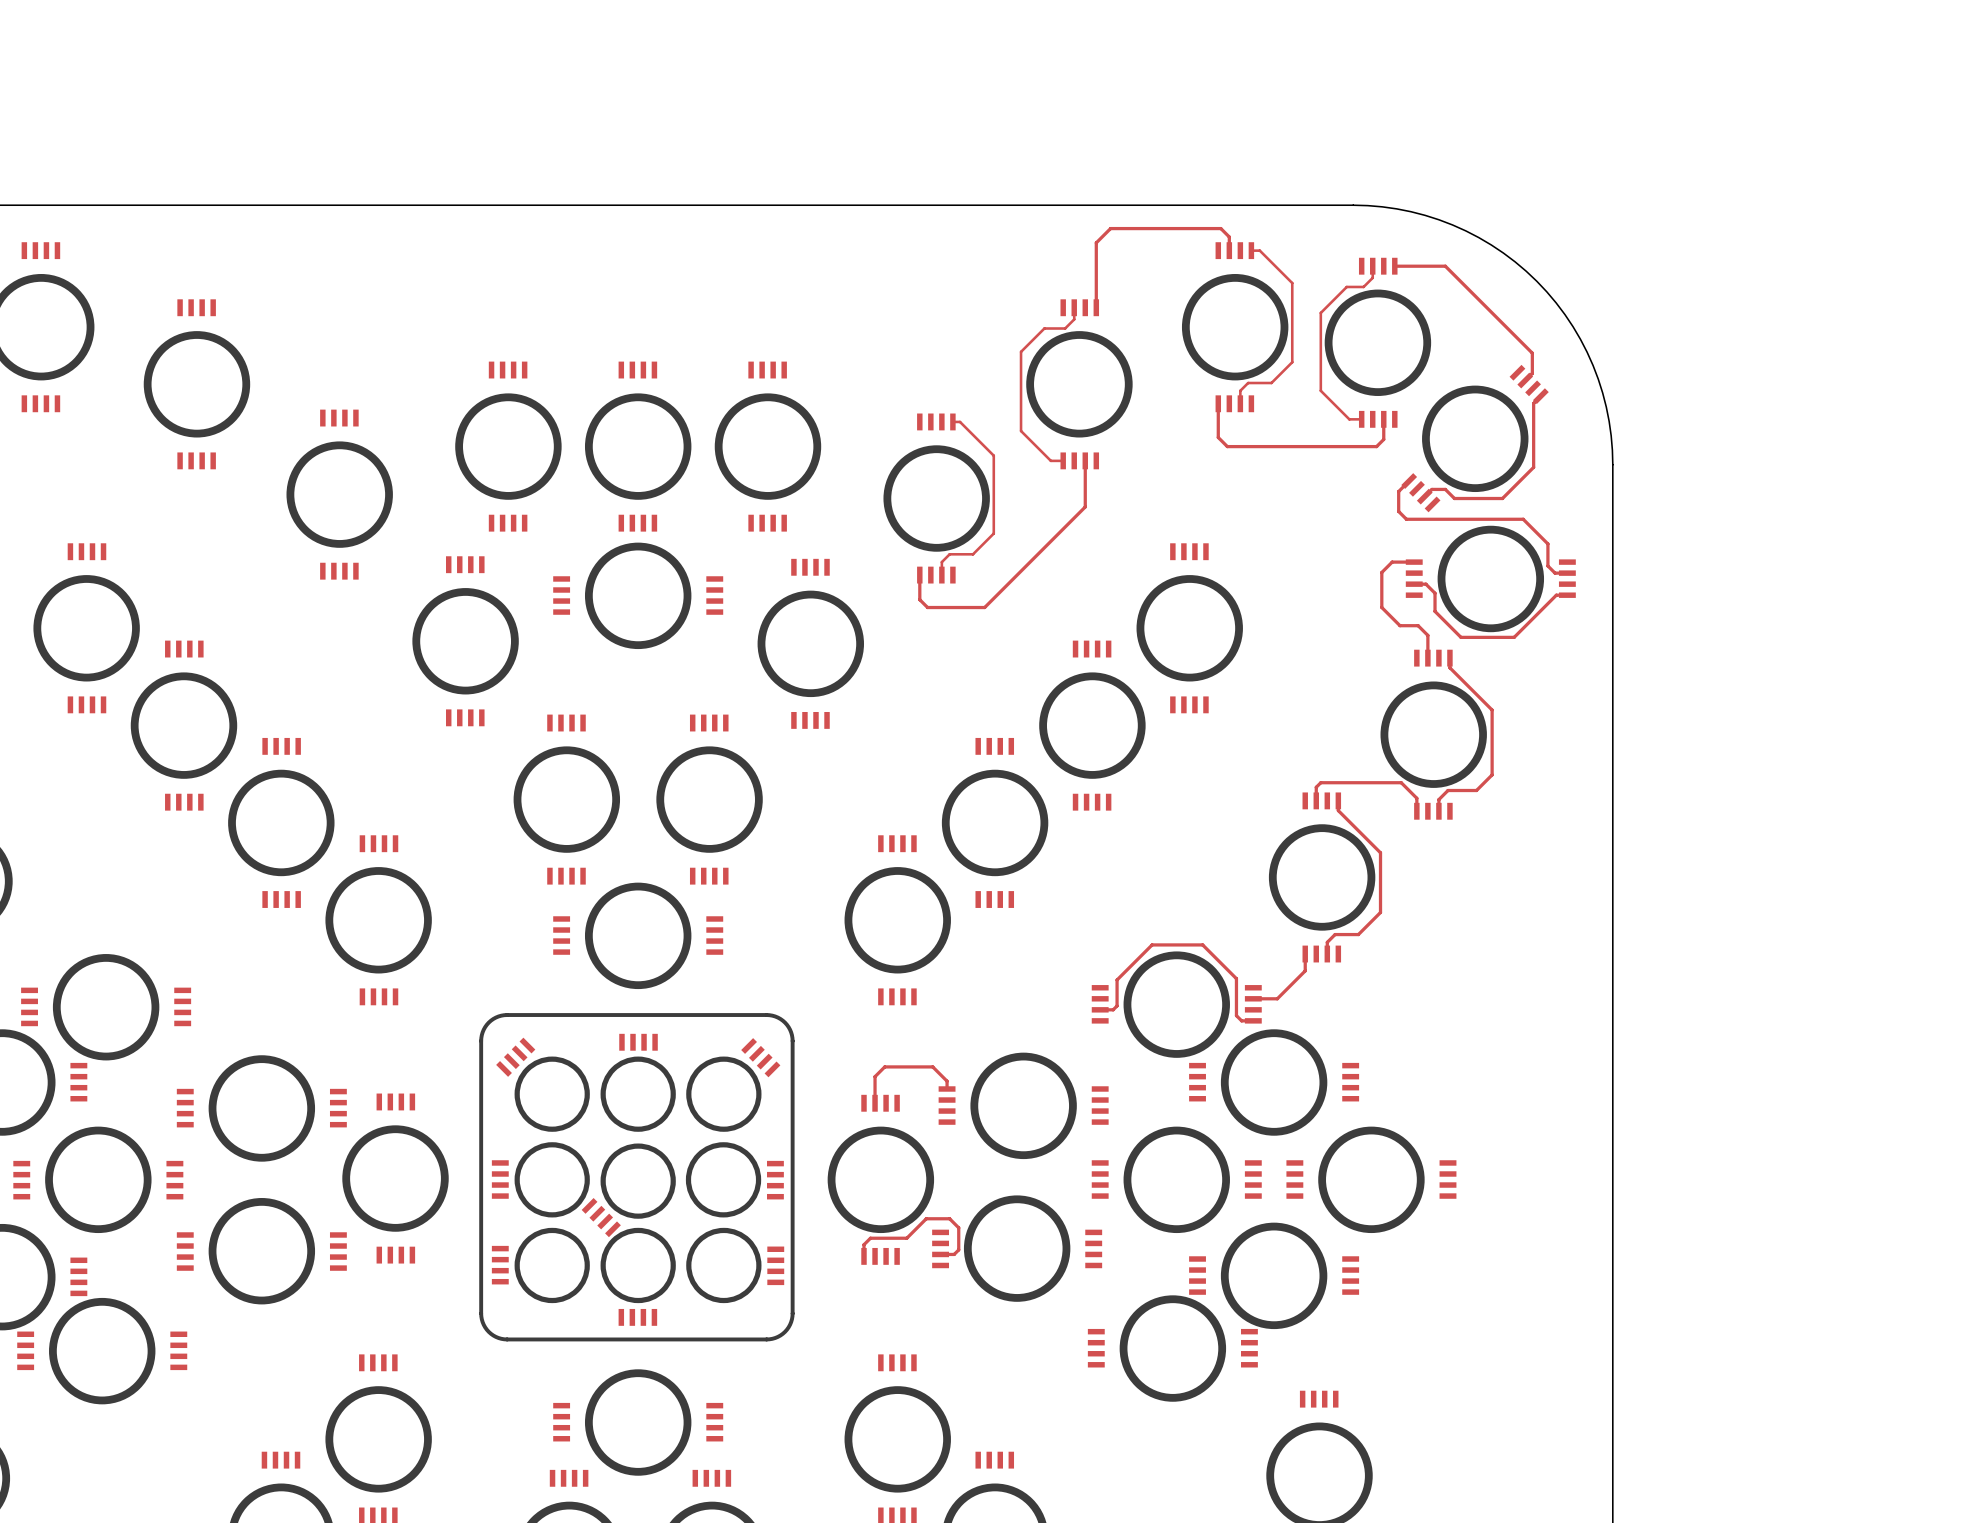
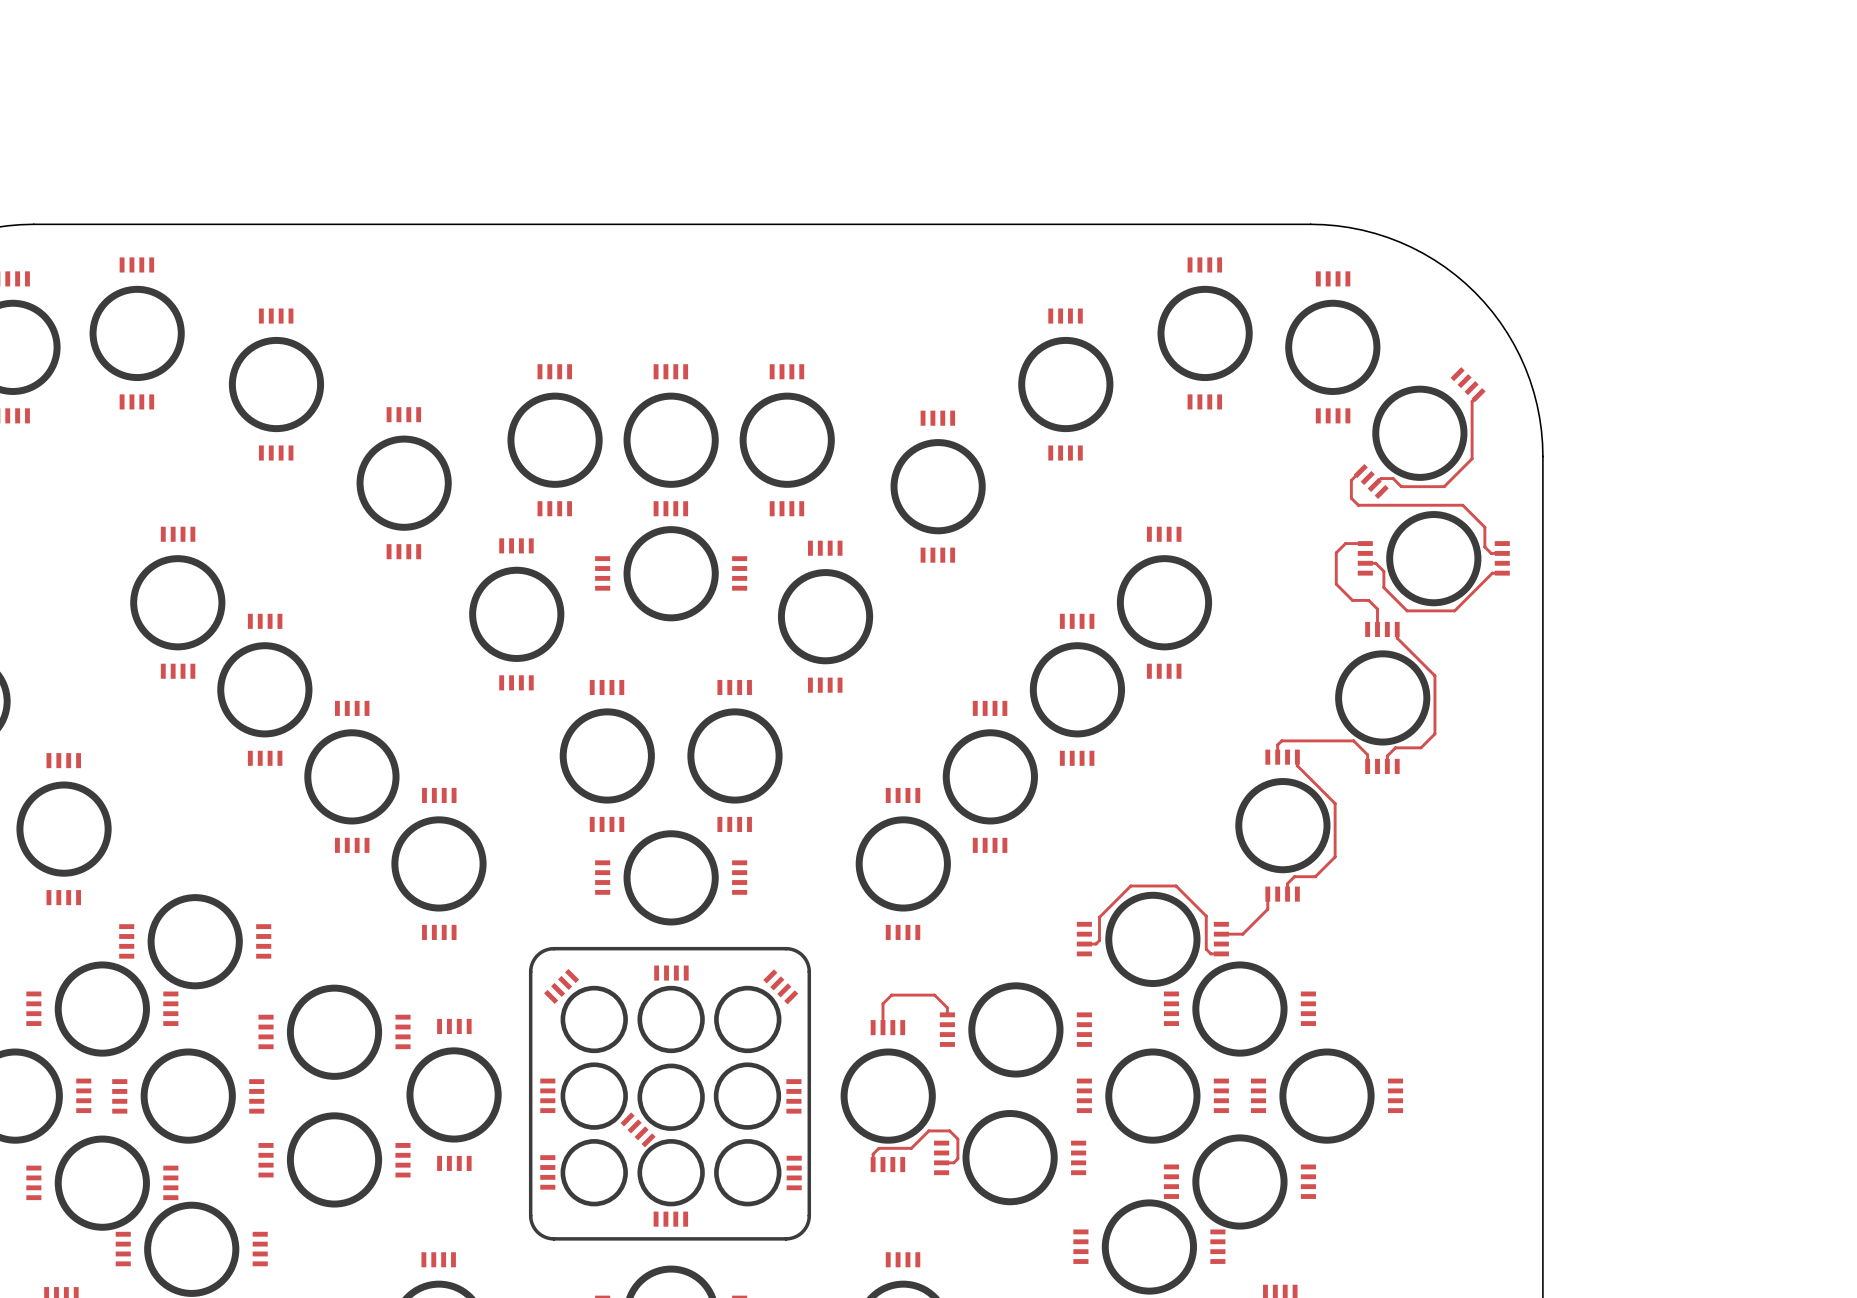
top track: (1229, 250) (1229, 237) (1220, 228) (1110, 228) (1096, 242) (1096, 307) -> none
top track: (1251, 250) (1259, 250) (1292, 283) (1292, 362) (1271, 383) (1248, 383) (1240, 390) (1240, 403) -> none
top track: (1372, 266) (1372, 277) (1363, 286) (1346, 286) (1320, 312) (1320, 390) (1349, 419) (1361, 419) -> none
top track: (1394, 266) (1445, 266) (1532, 353) (1532, 373) (1525, 380) -> none
top track: (1074, 307) (1074, 319) (1065, 328) (1044, 328) (1021, 351) (1021, 431) (1050, 460) (1063, 460) -> none
part rotation: 0° (1079, 384) -> 180° (1065, 384)
top track: (1218, 403) (1218, 437) (1227, 446) (1376, 446) (1383, 439) (1383, 419) -> none
top track: (952, 421) (960, 421) (993, 455) (993, 533) (973, 554) (949, 554) (941, 562) (941, 575) -> none
top track: (1085, 460) (1085, 506) (984, 607) (927, 607) (919, 599) (919, 575) -> none

